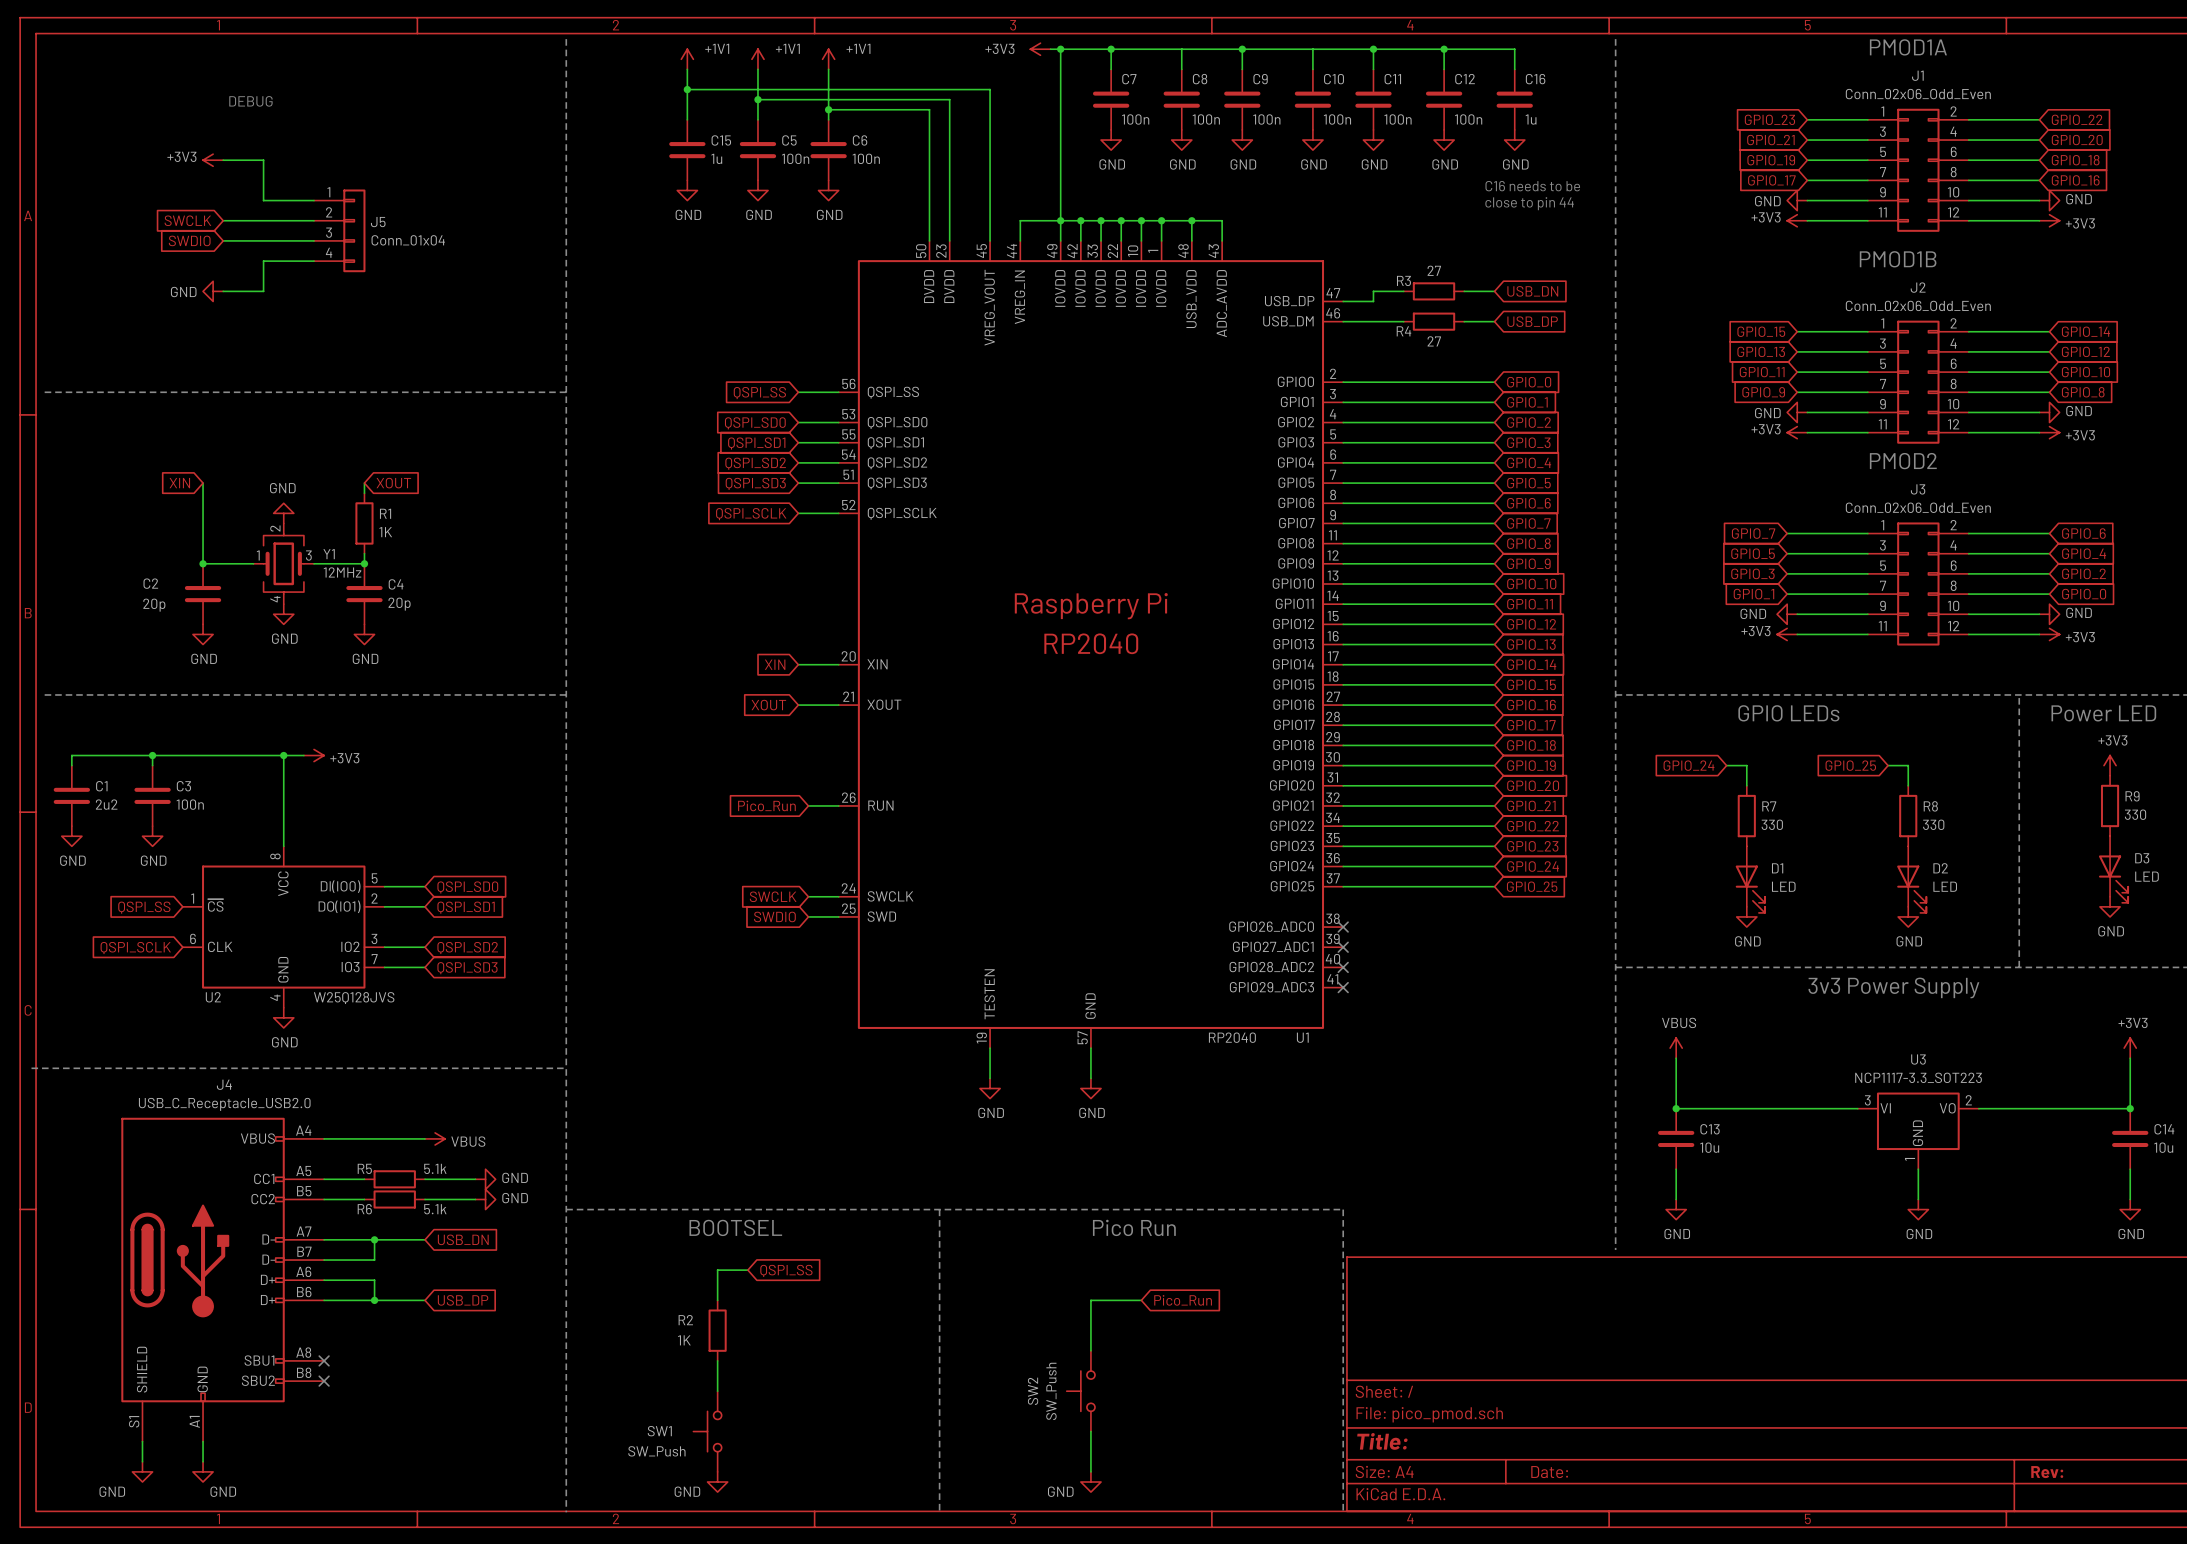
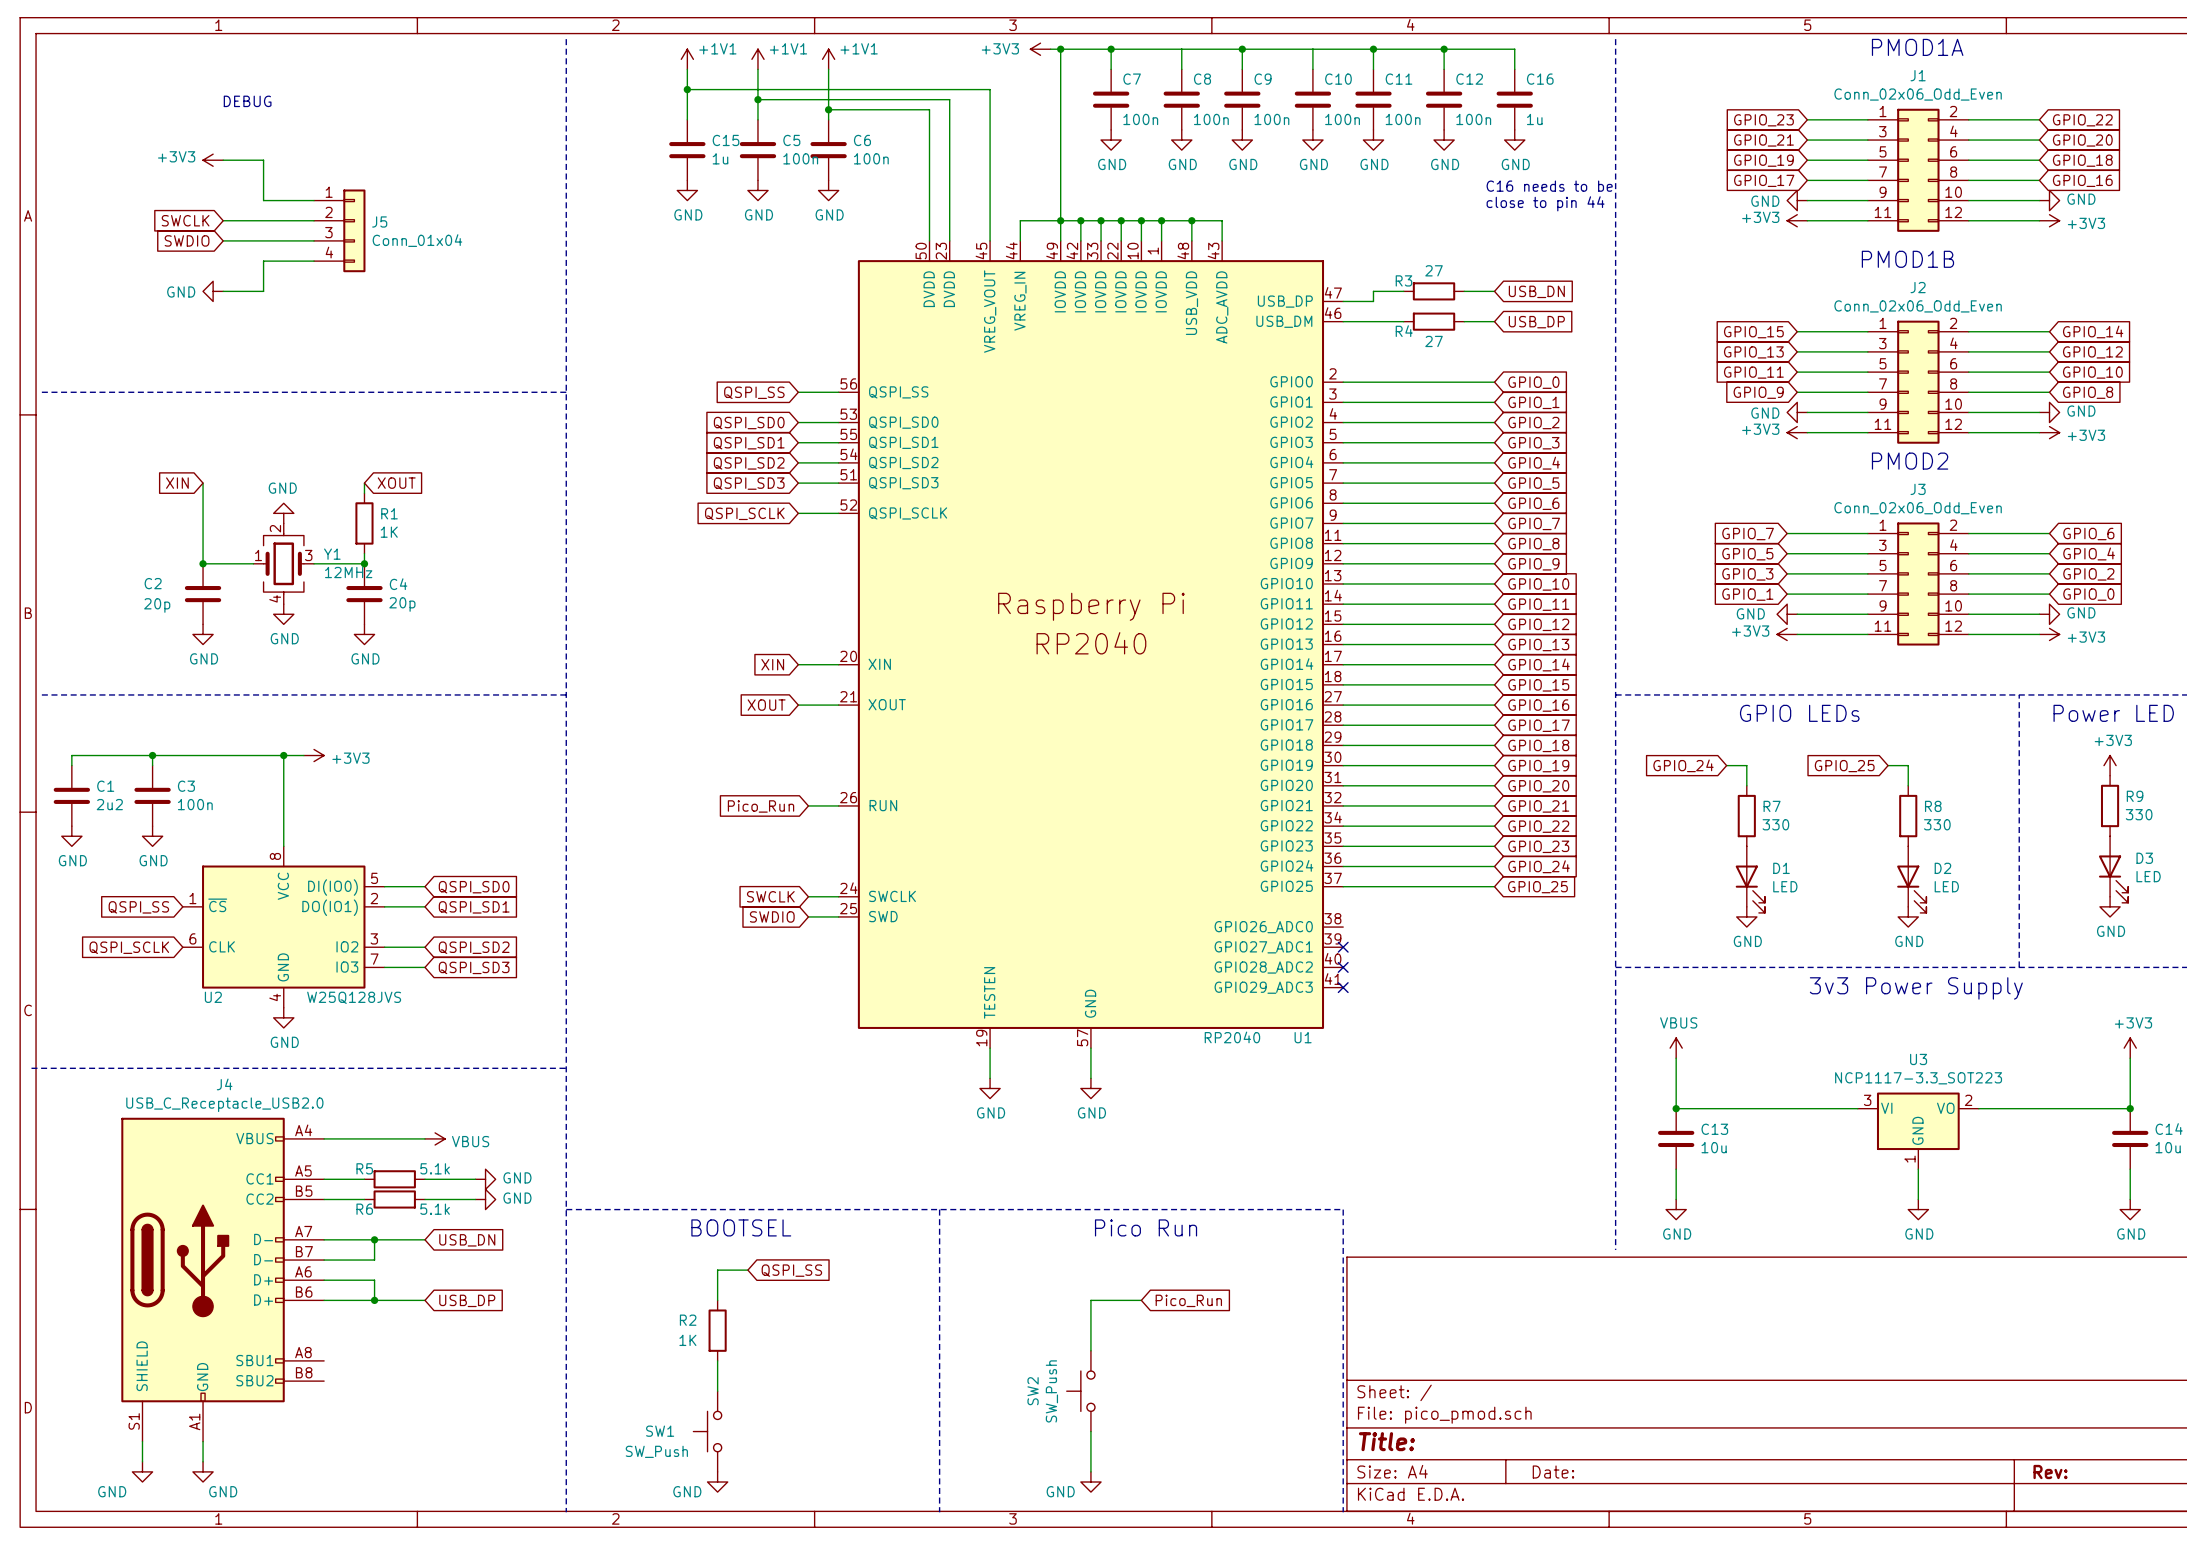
no-connect mark: (1343, 927) -> none
no-connect mark: (324, 1360) -> none
no-connect mark: (324, 1381) -> none

